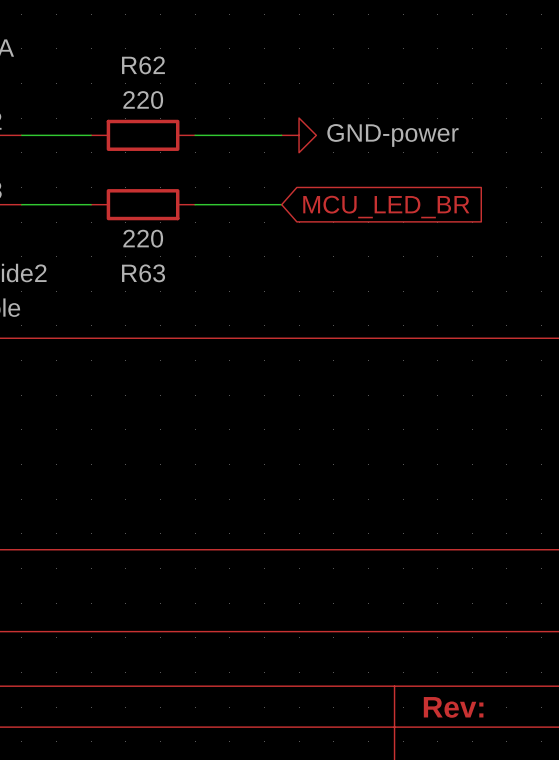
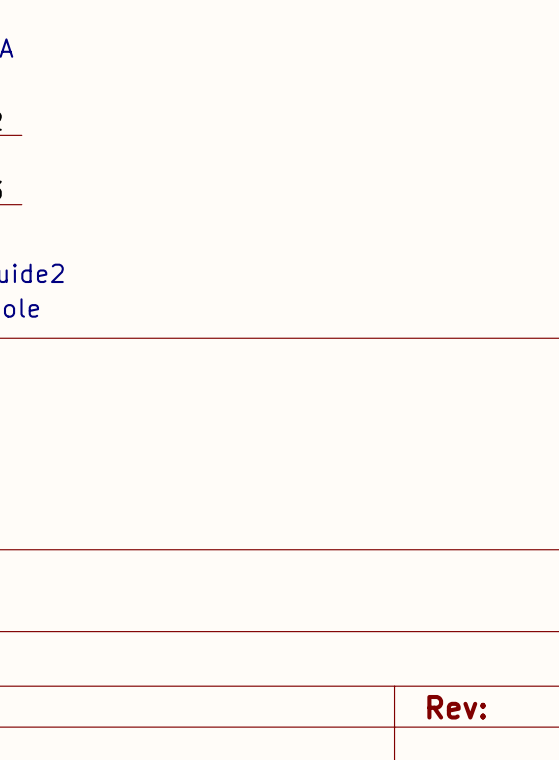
wire: (21, 135) (91, 135) -> none
R62: 220 (143, 135) -> none
wire: (195, 135) (281, 135) -> none
power symbol: GND-power (299, 135) -> none
wire: (21, 204) (91, 204) -> none
R63: 220 (143, 204) -> none
wire: (195, 204) (281, 204) -> none
global label: MCU_LED_BR (386, 207) -> none

